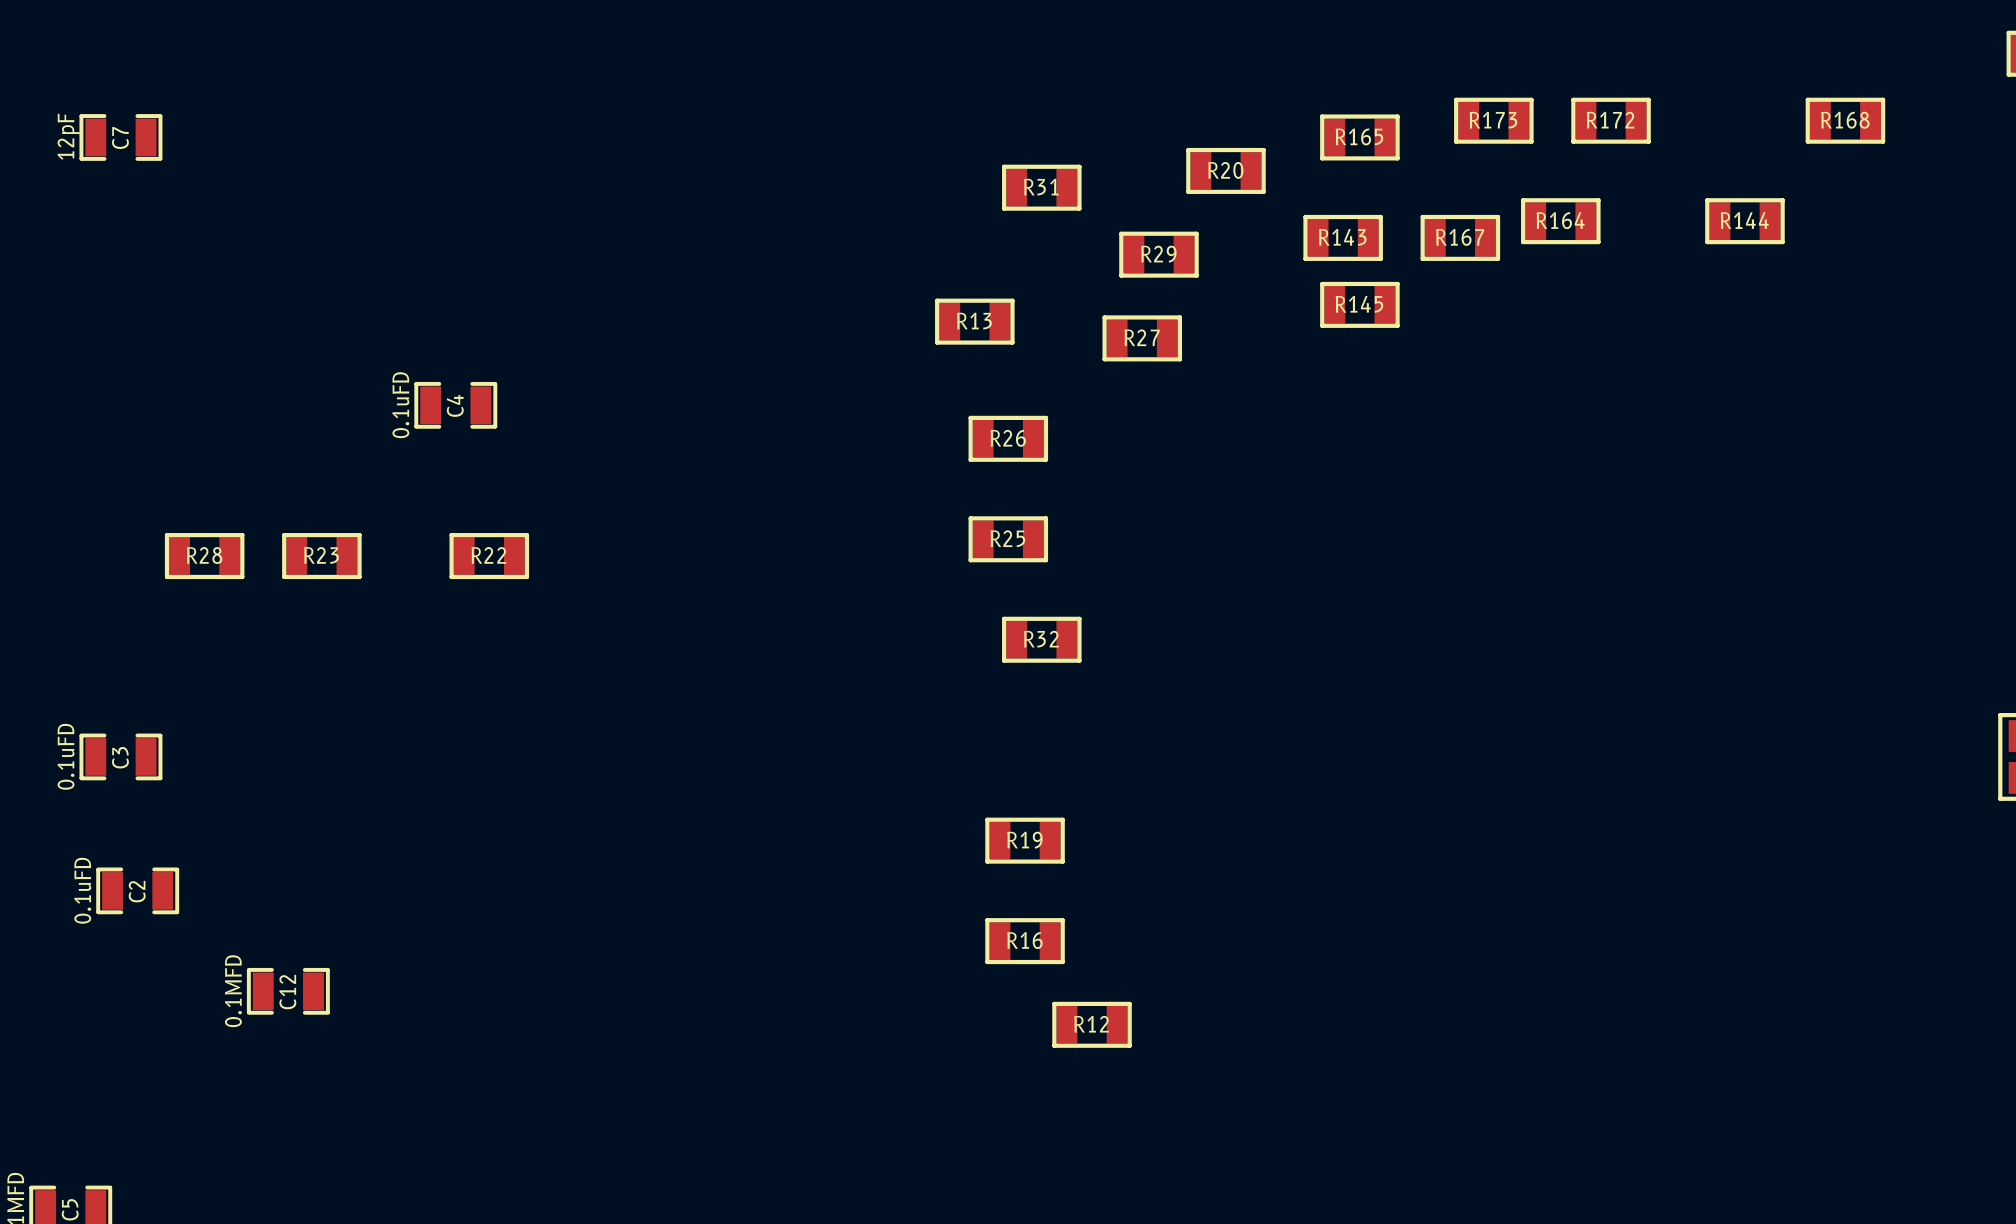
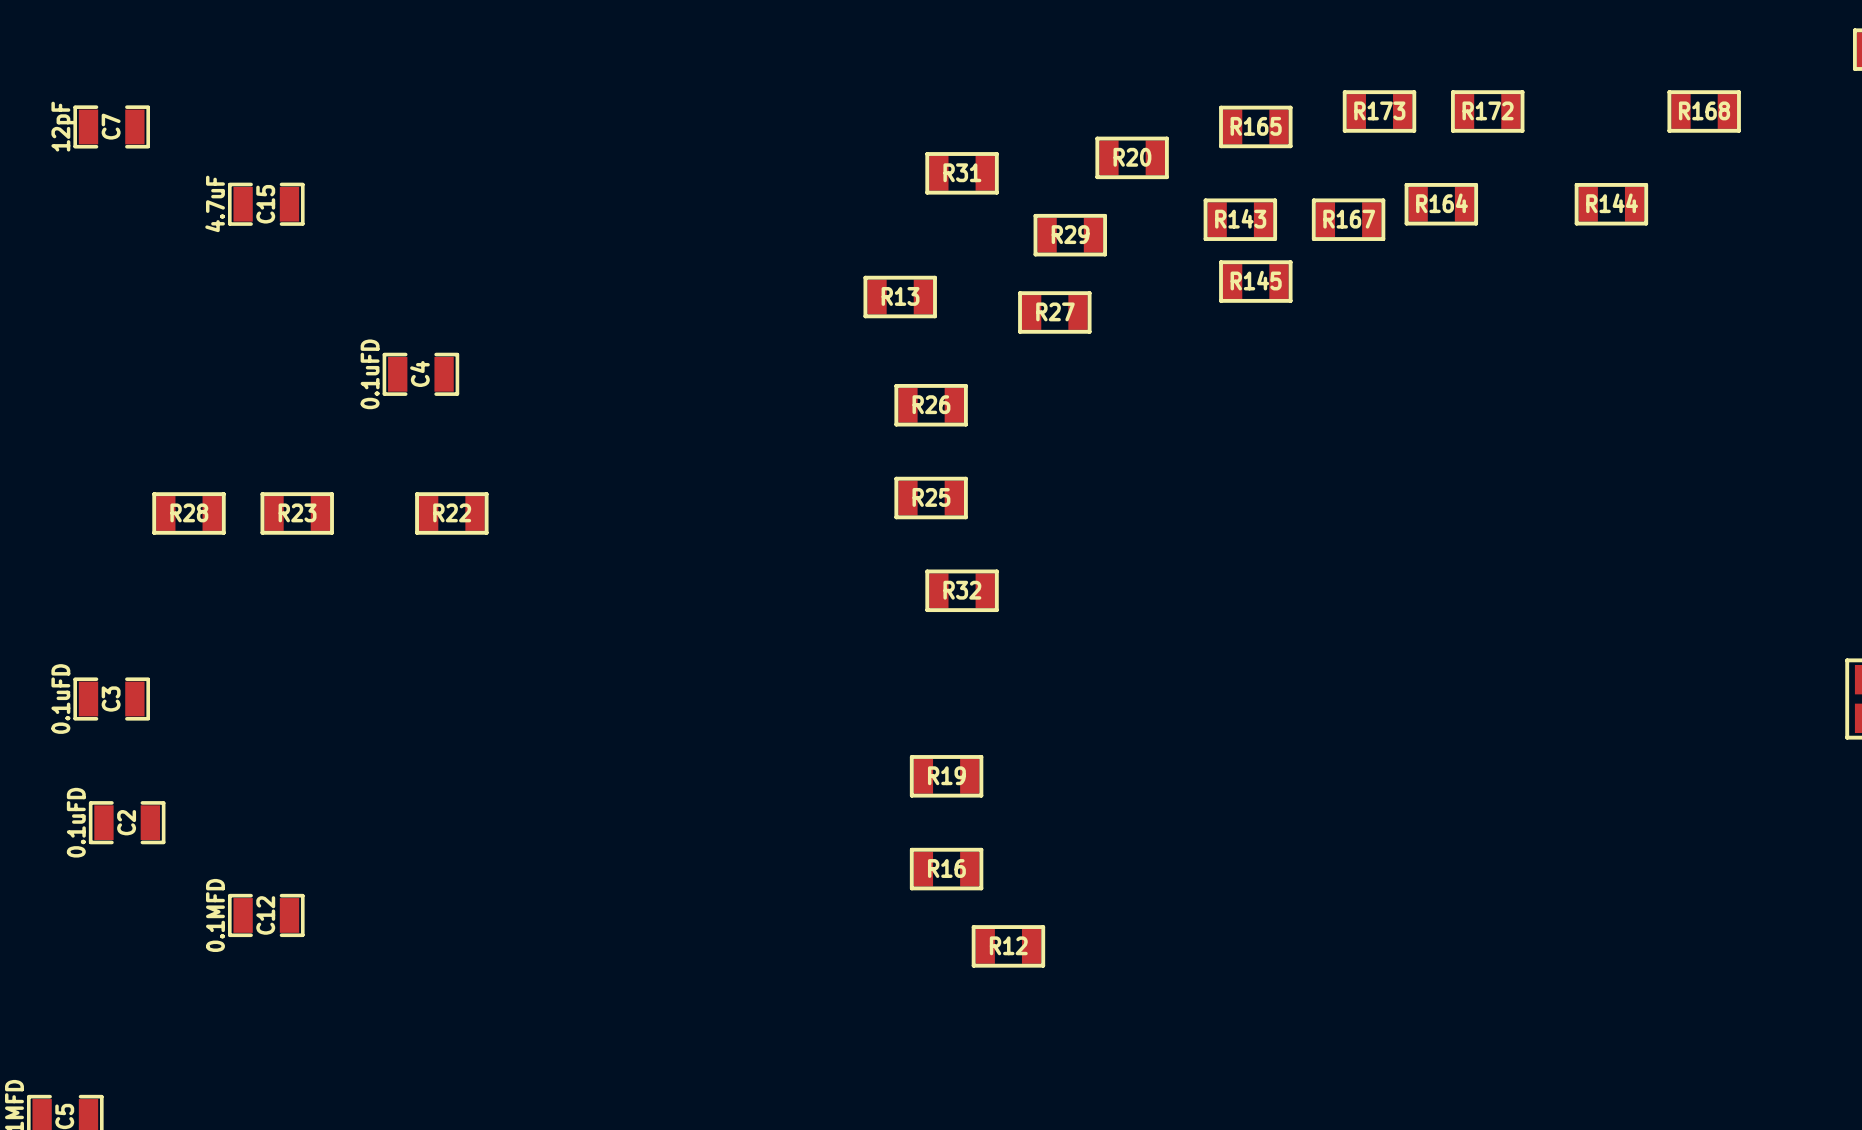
C15: none -> 4.7uF (266, 204)

